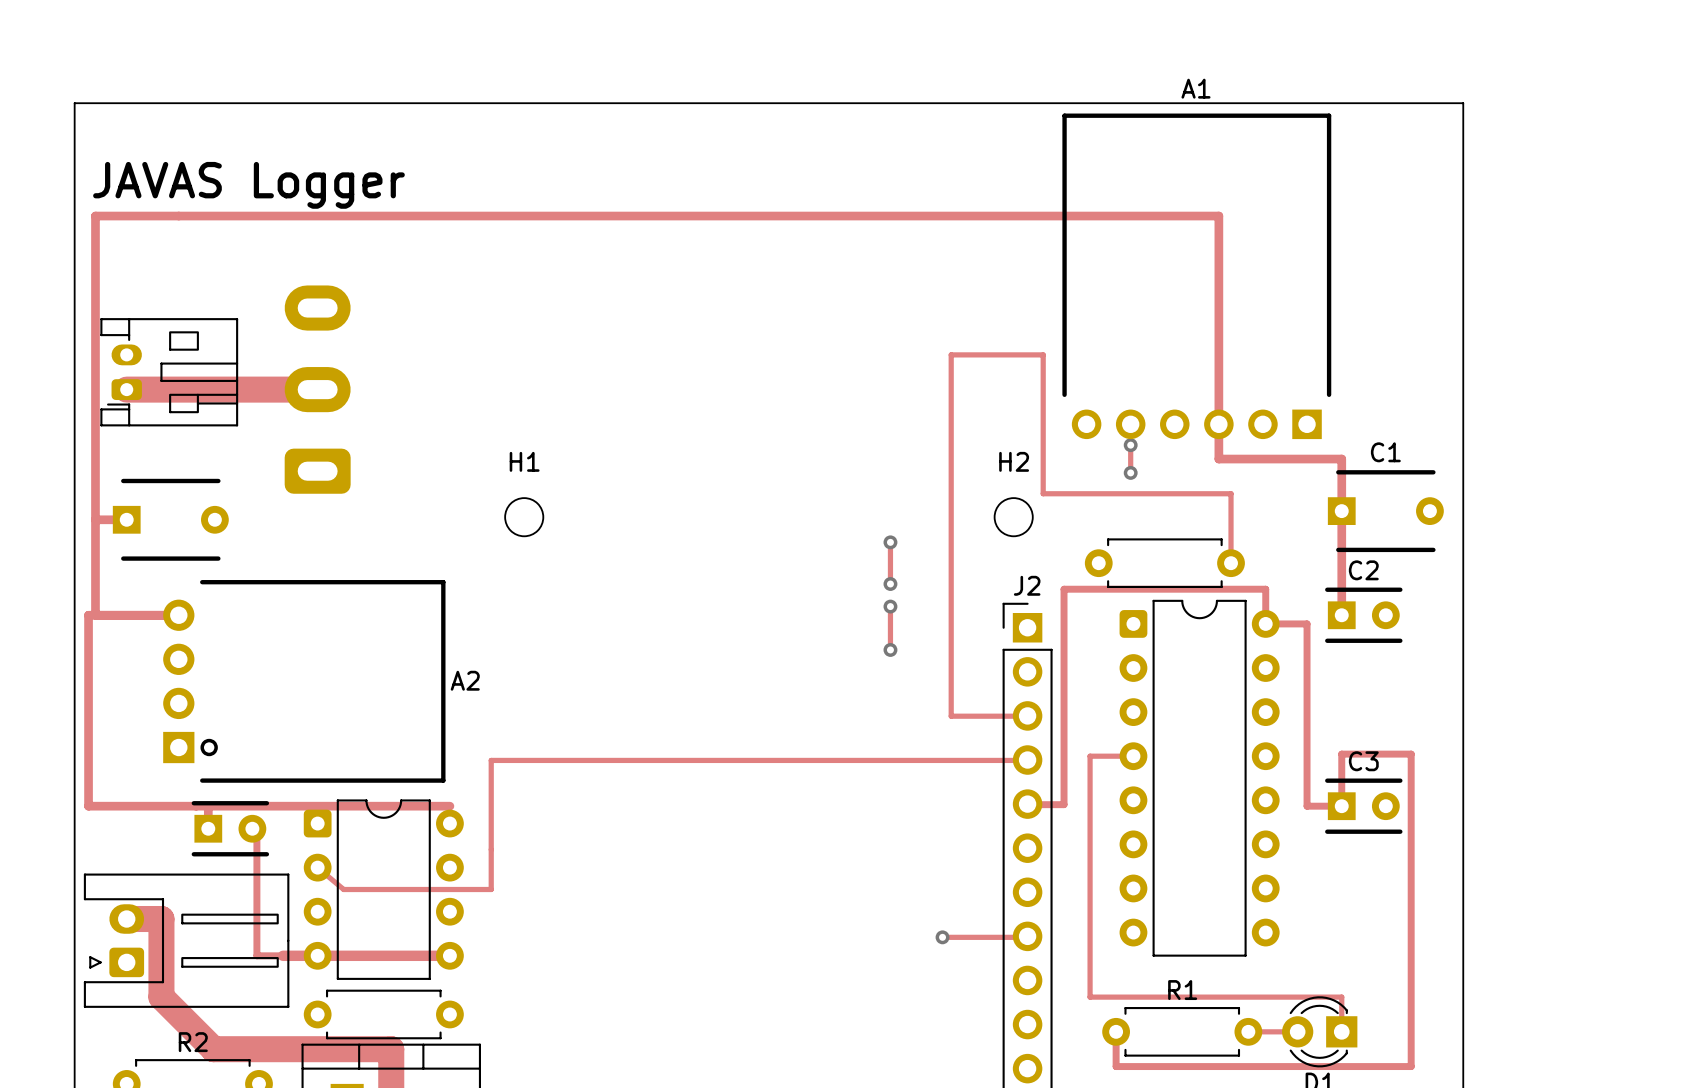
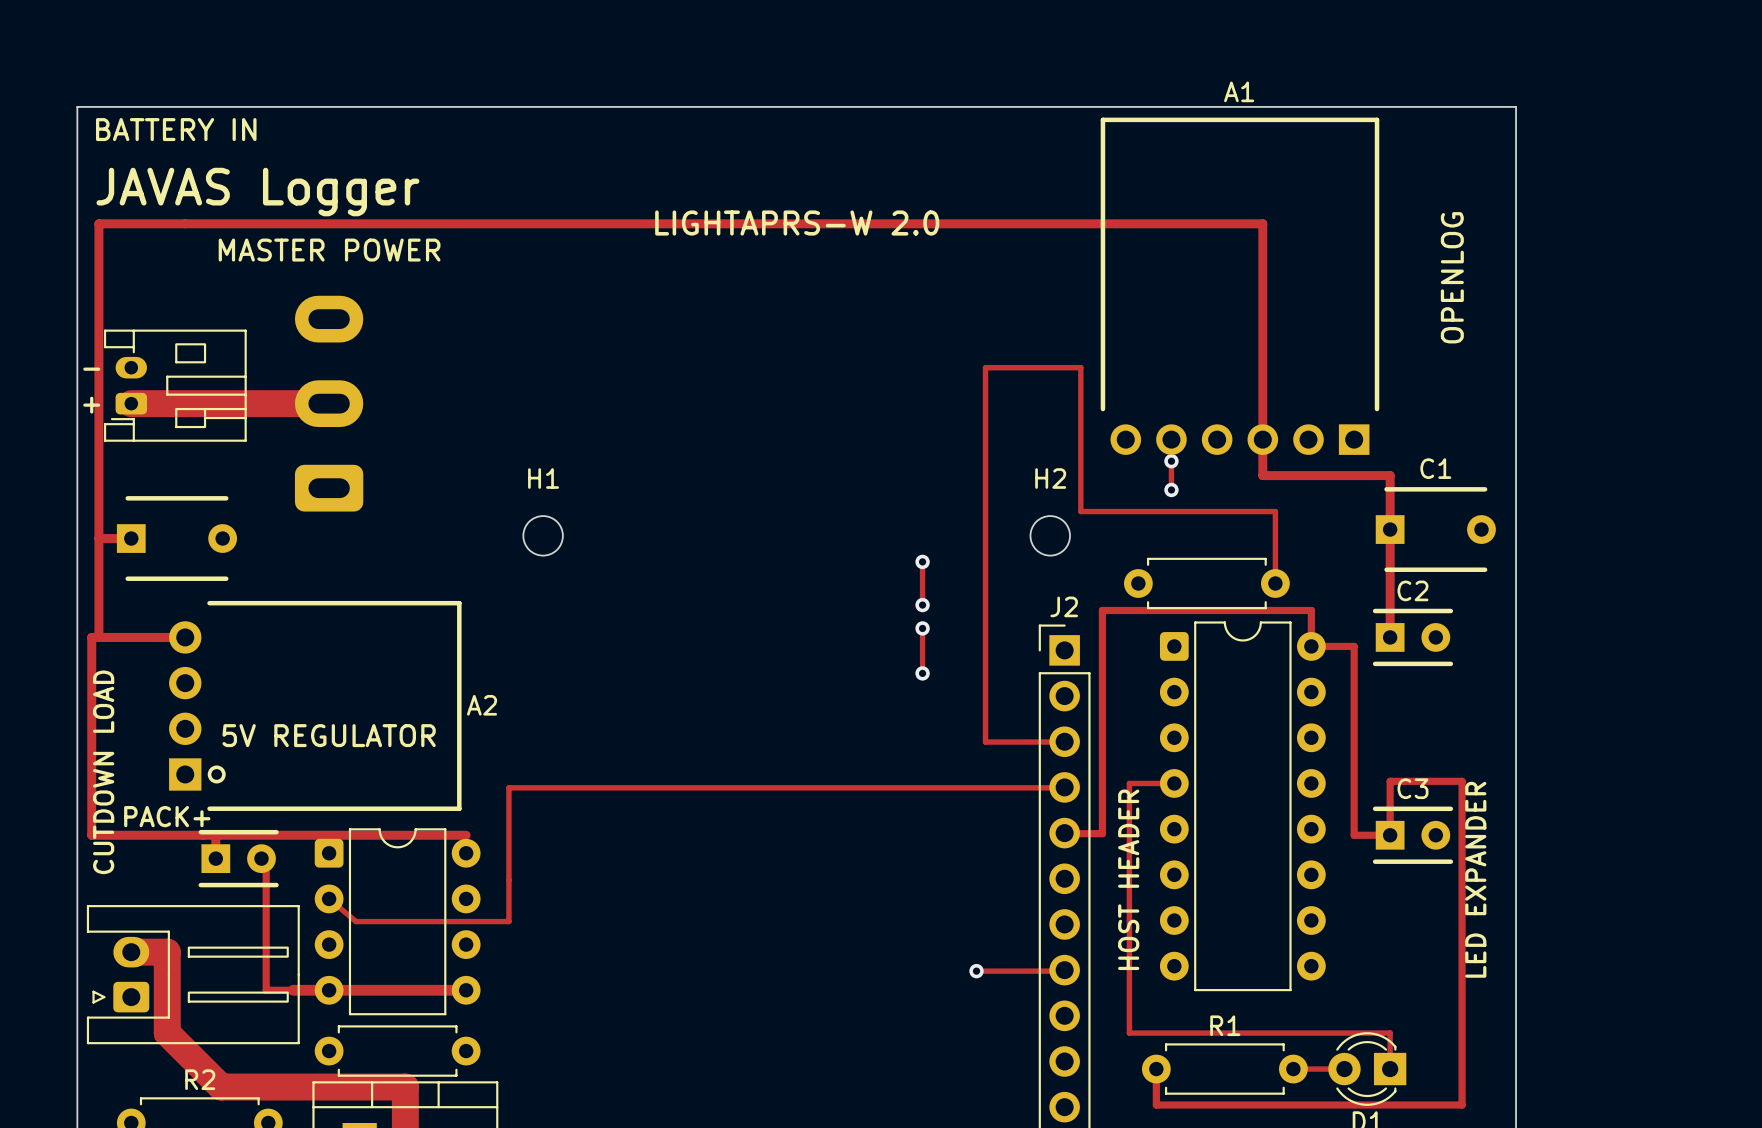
text: none -> BATTERY IN (176, 129)
text: none -> LIGHTAPRS-W 2.0 (797, 223)
text: none -> MASTER POWER (329, 250)
text: none -> OPENLOG (1452, 277)
text: none -> - (91, 369)
text: none -> + (91, 405)
text: none -> 5V REGULATOR (329, 735)
text: none -> CUTDOWN LOAD (103, 772)
text: none -> PACK+ (167, 816)
text: none -> HOST HEADER (1128, 879)
text: none -> LED EXPANDER (1475, 879)

